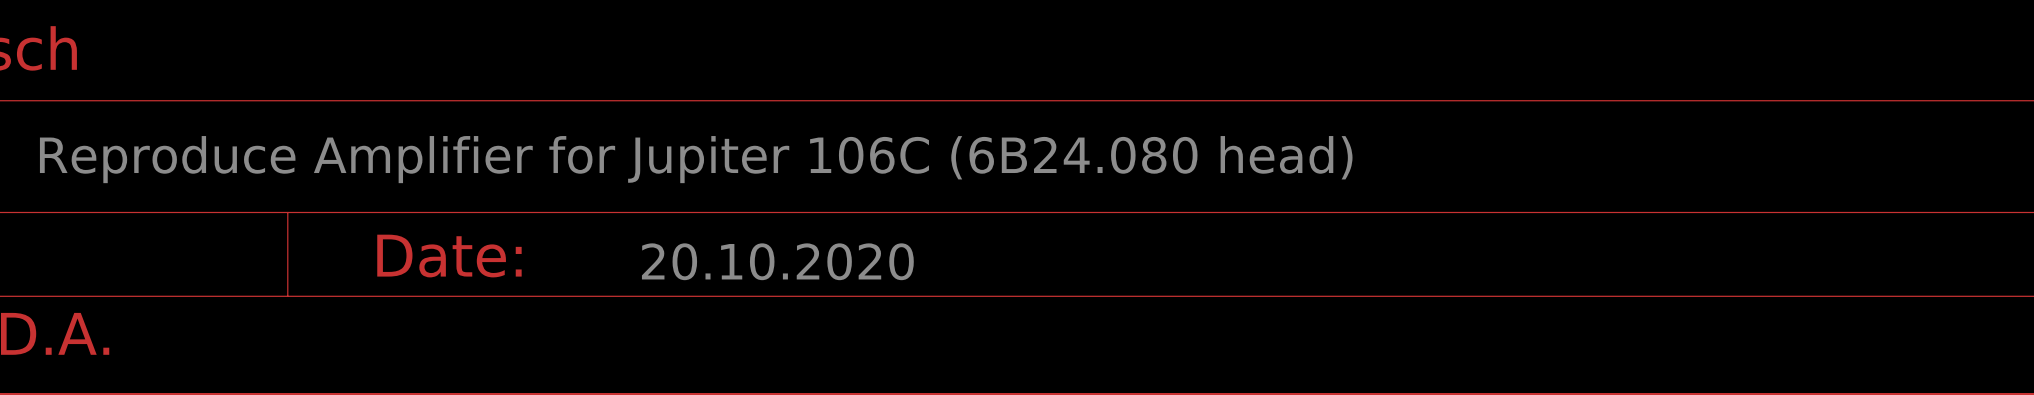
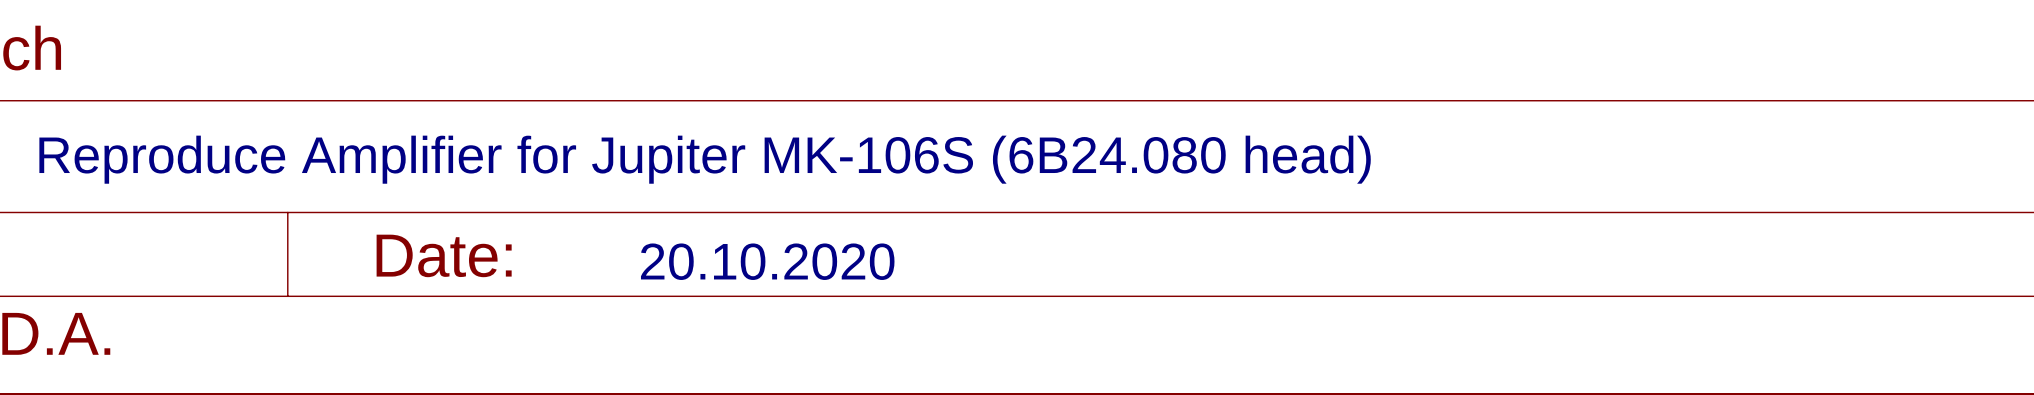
text: Reproduce Amplifier for Jupiter 106C (6В24.080 head) (696, 159) -> Reproduce Amplifier for Jupiter MK-106S (6В24.080 head) (705, 159)

